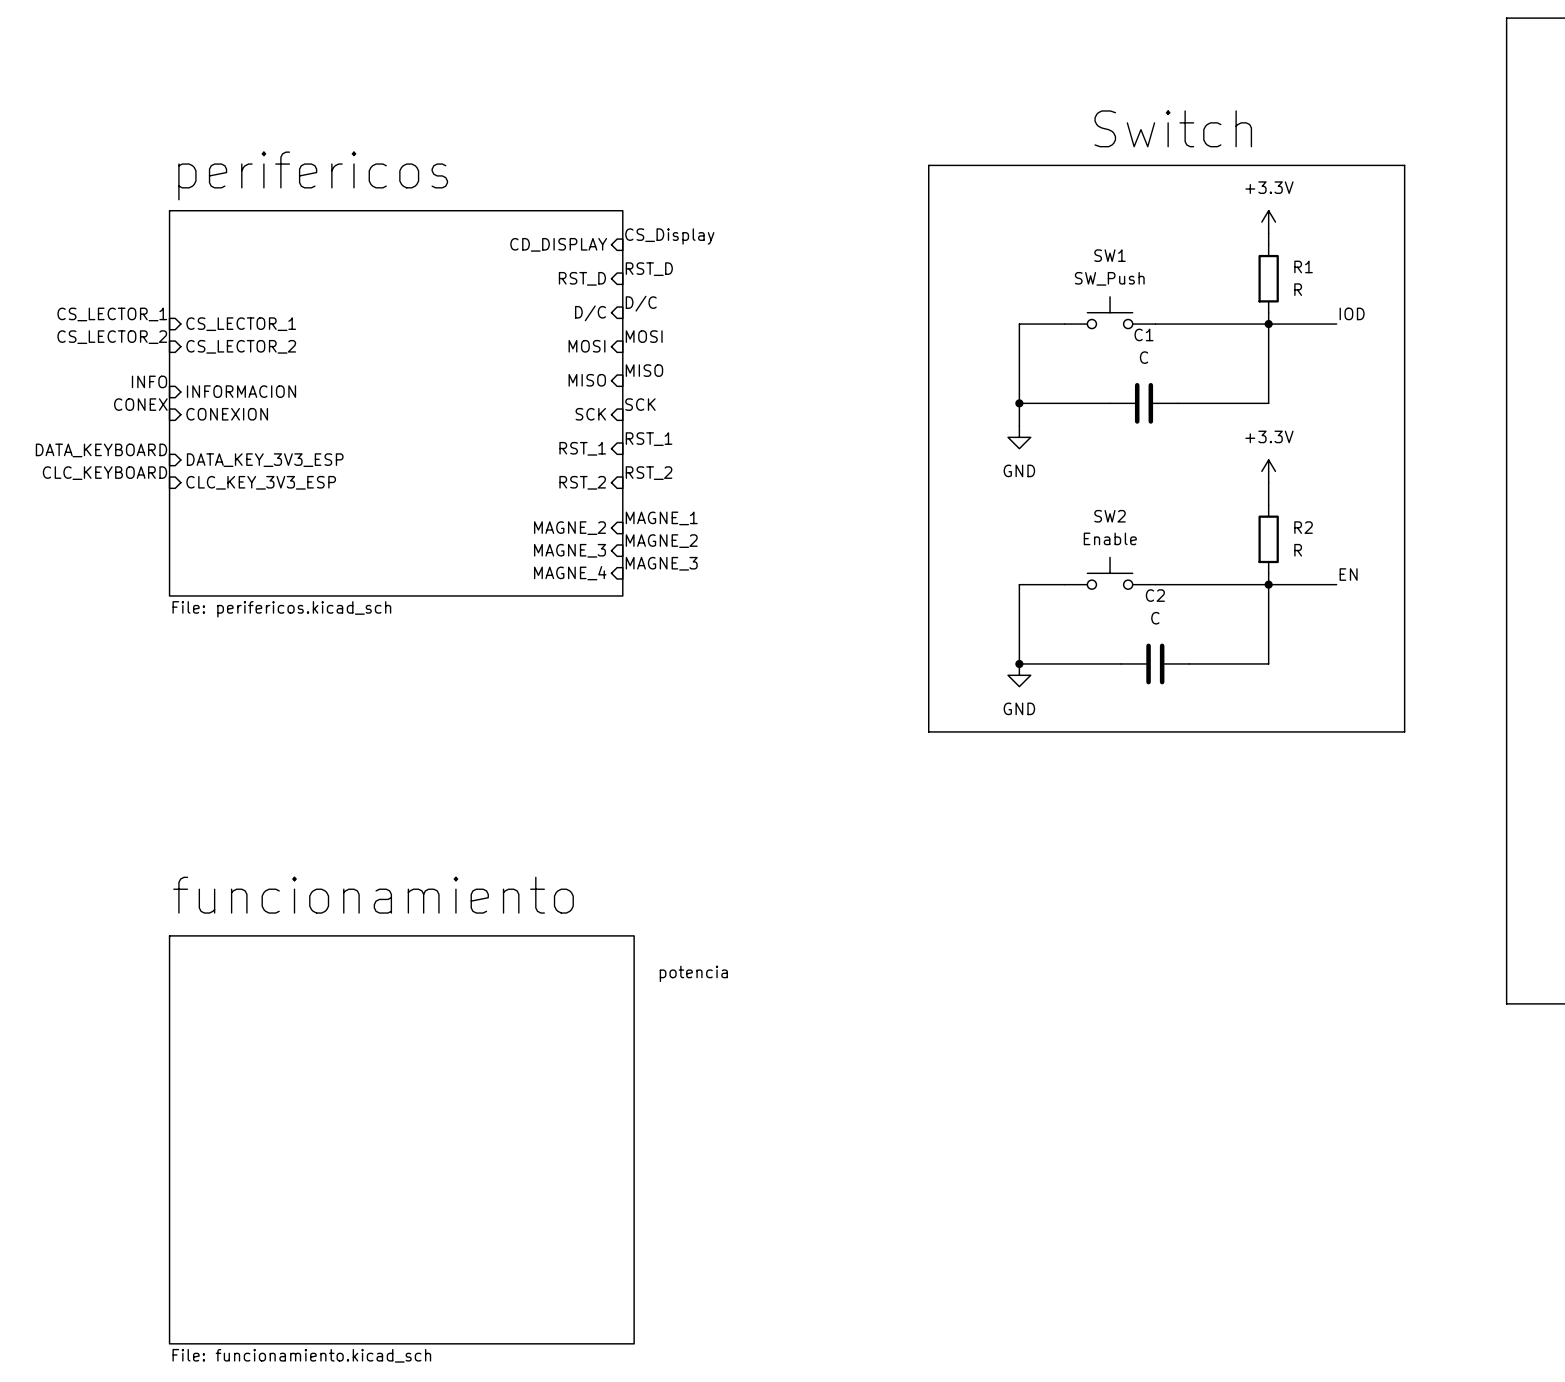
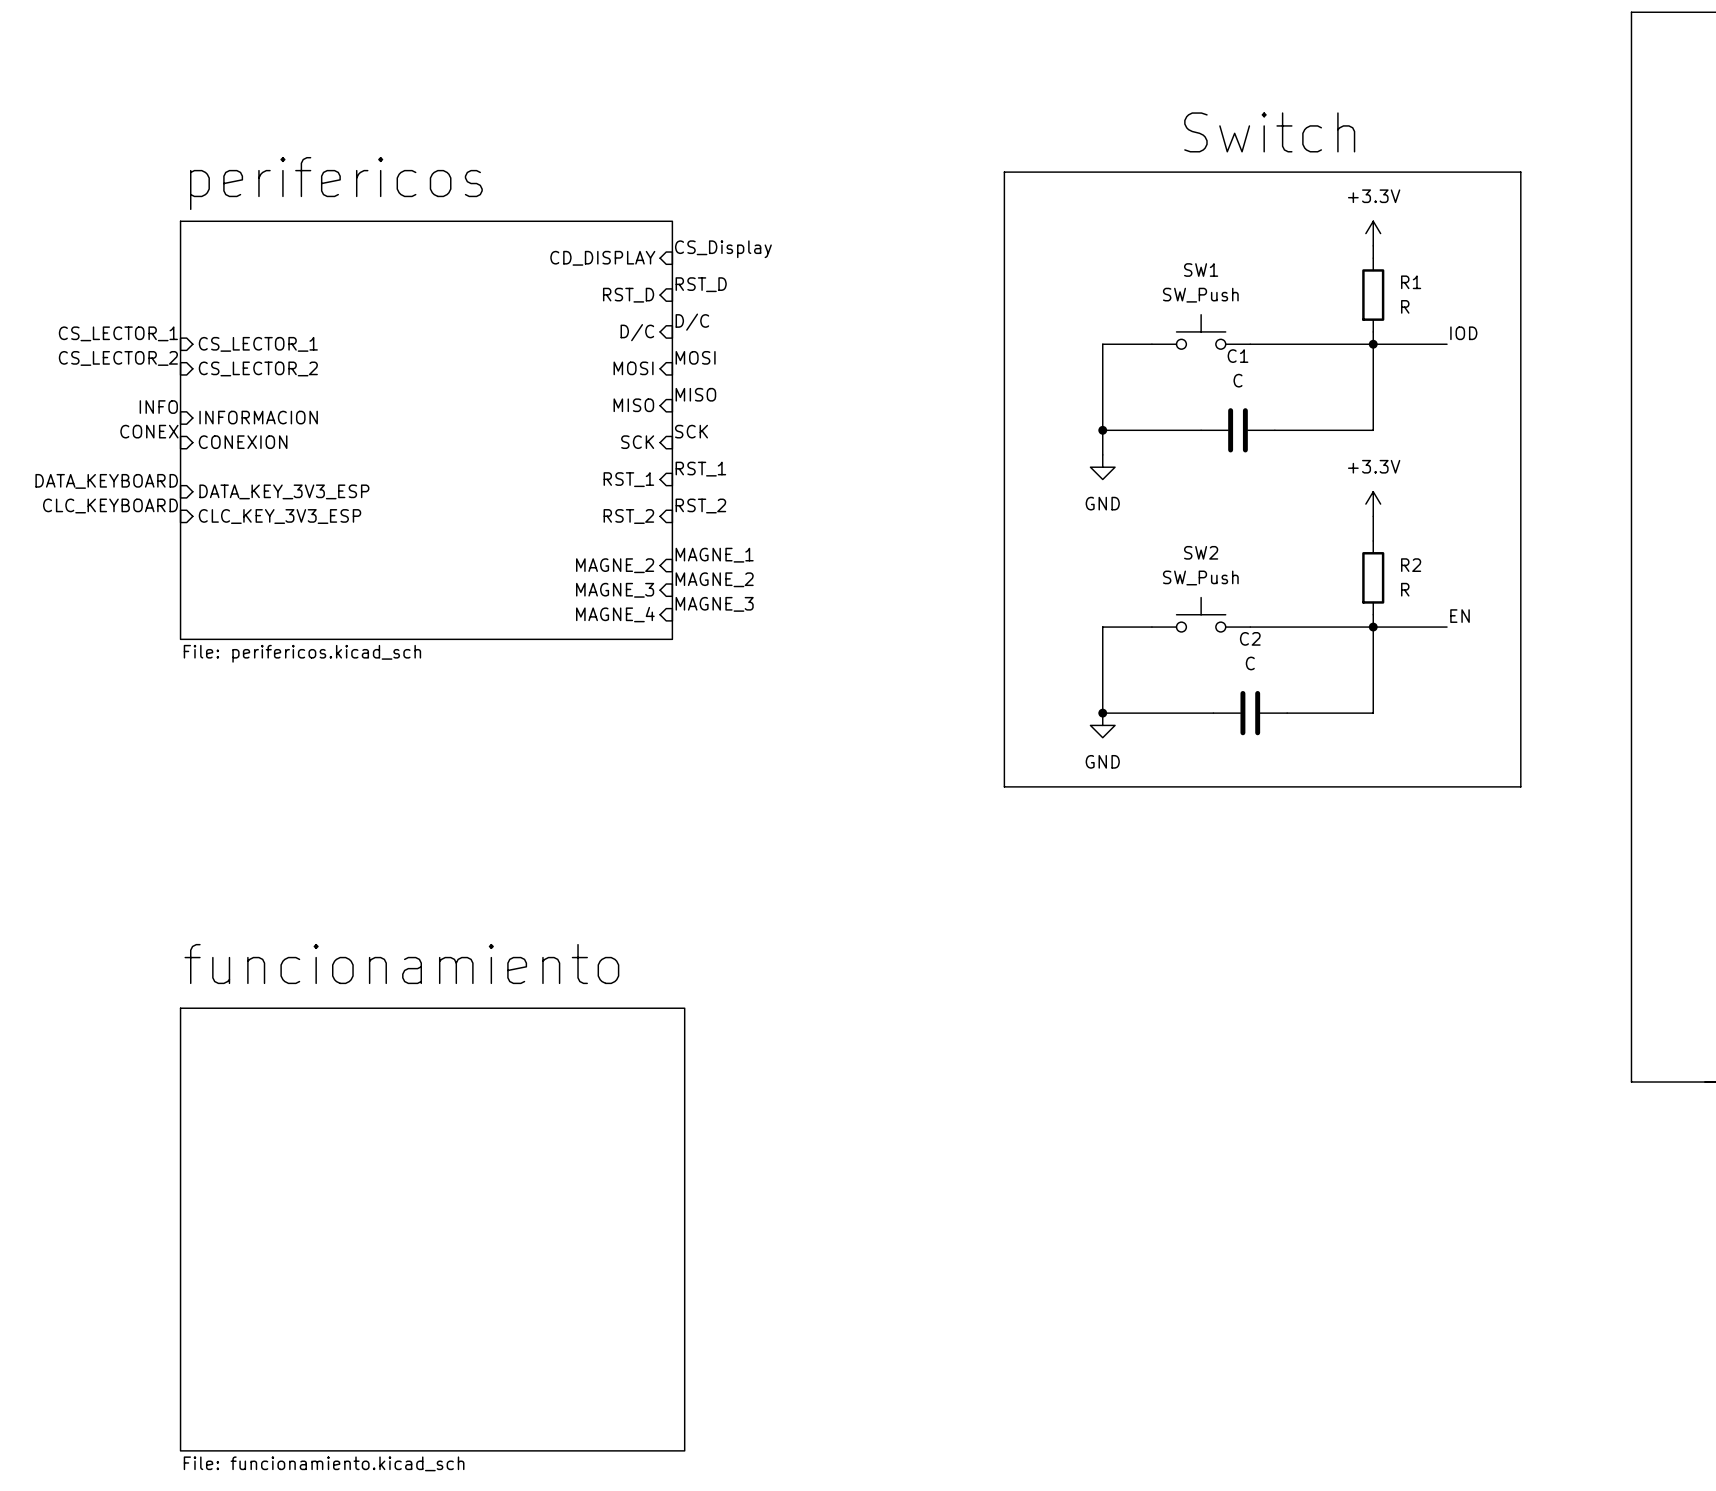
SW2 value: Enable (1110, 538) -> SW_Push (1200, 577)
text: potencia (693, 973) -> none

